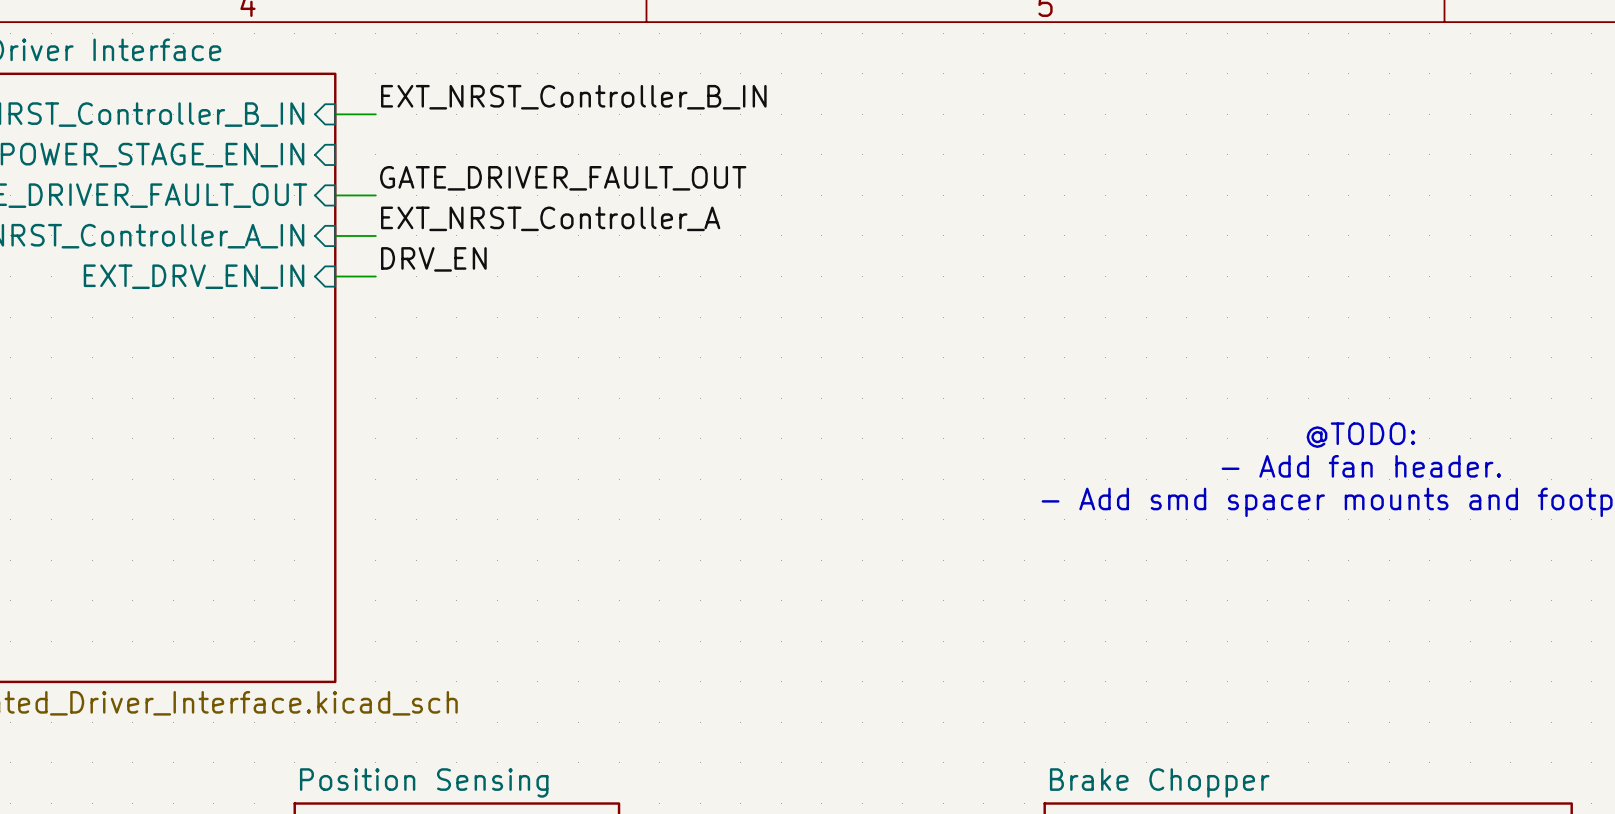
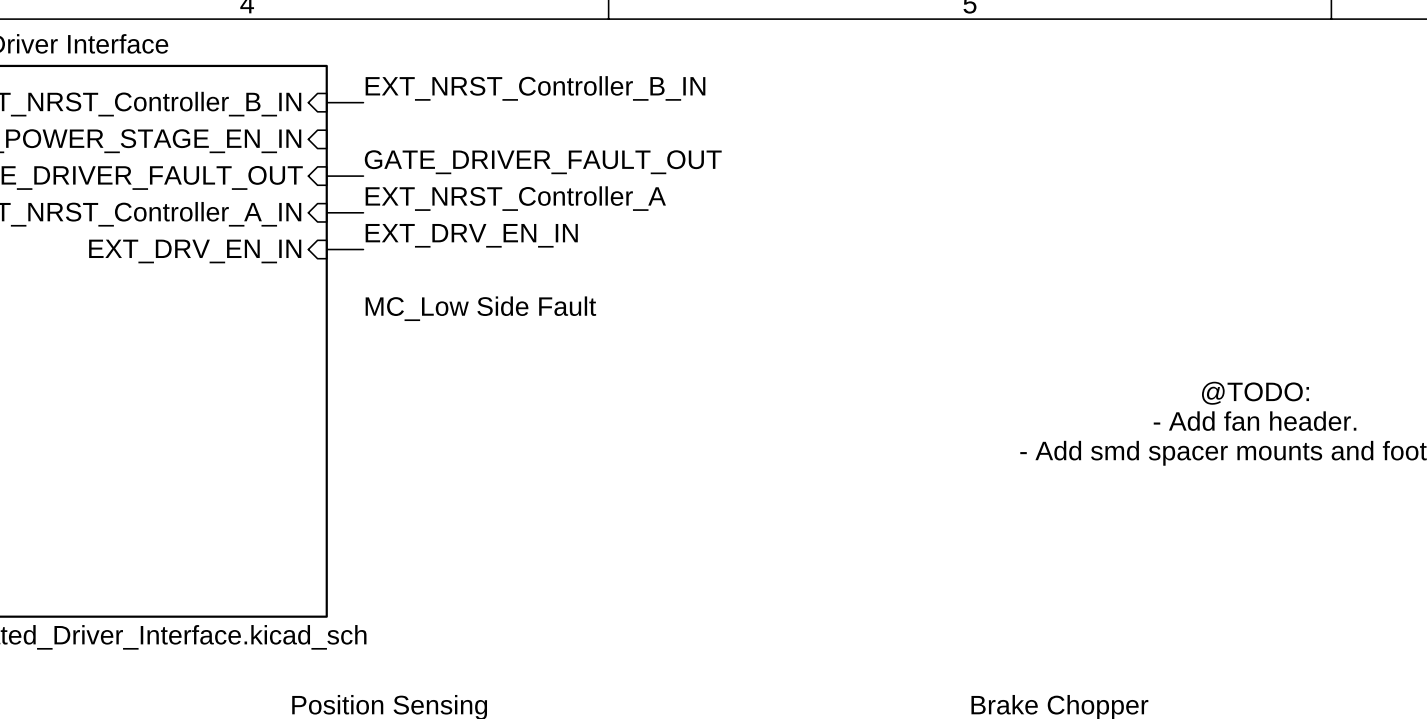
label: DRV_EN (433, 259) -> EXT_DRV_EN_IN (471, 235)
label: none -> MC_Low Side Fault (480, 308)

